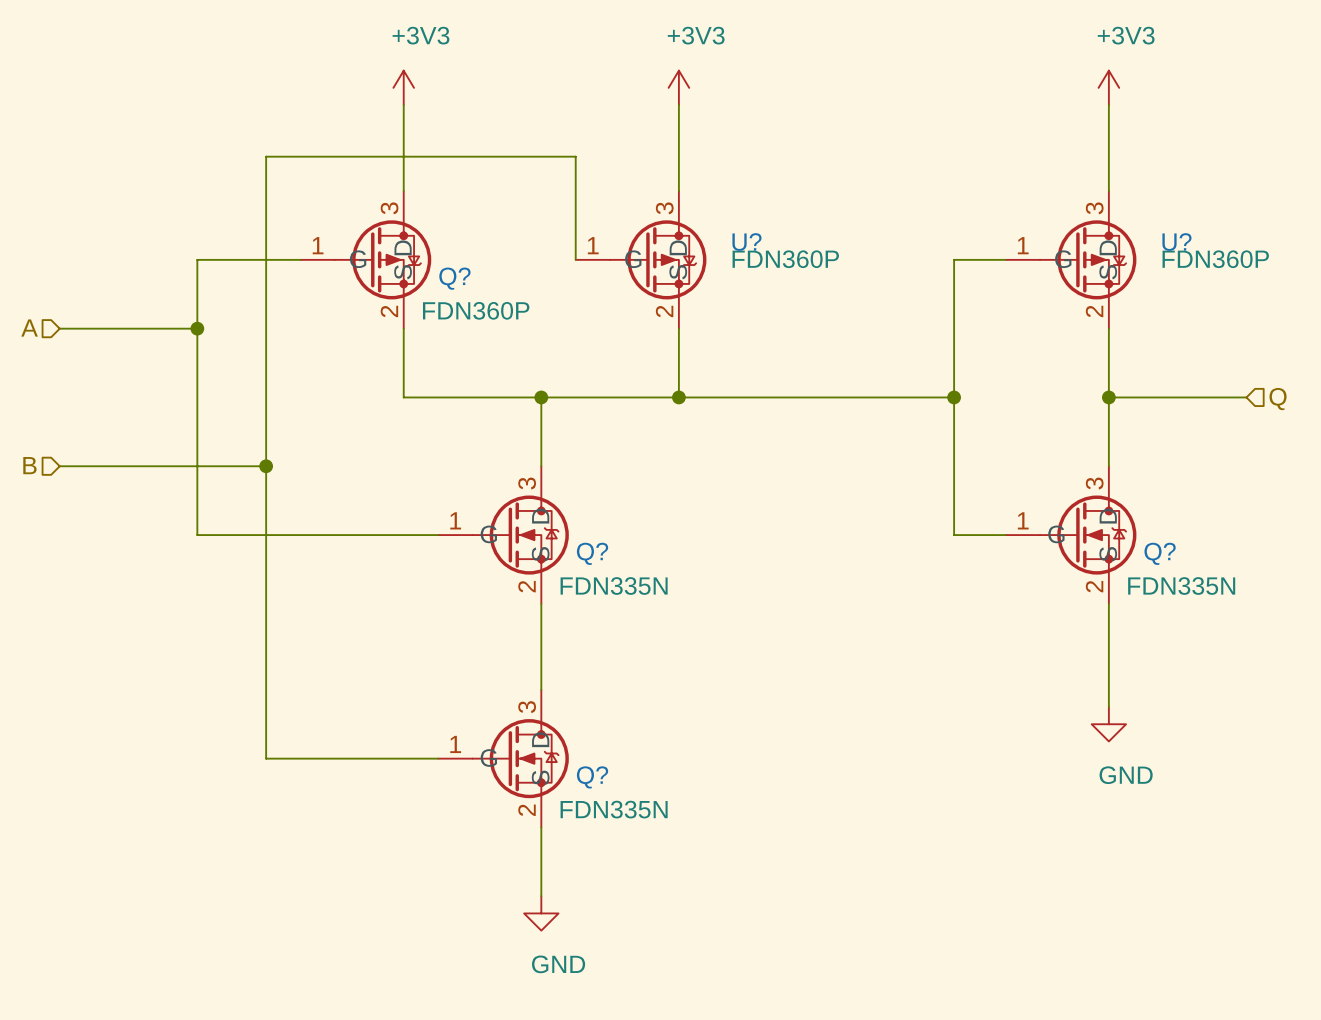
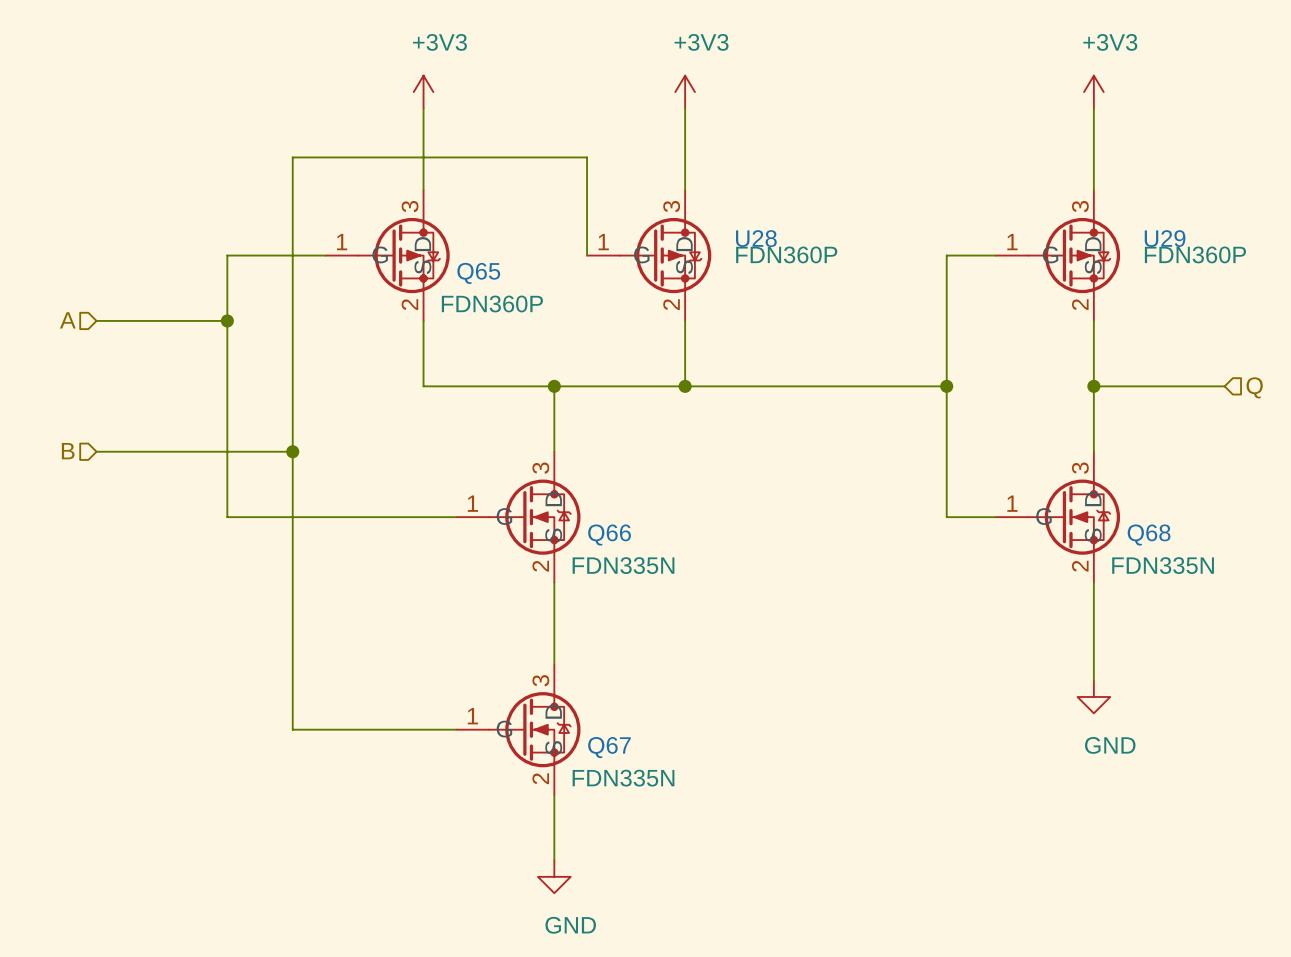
U? name: U? (746, 242) -> U28 (756, 238)
U? name: U? (1176, 242) -> U29 (1165, 238)
Q? name: Q? (454, 278) -> Q65 (478, 273)
Q? name: Q? (592, 553) -> Q66 (609, 535)
Q? name: Q? (1160, 553) -> Q68 (1149, 535)
Q? name: Q? (592, 777) -> Q67 (609, 747)

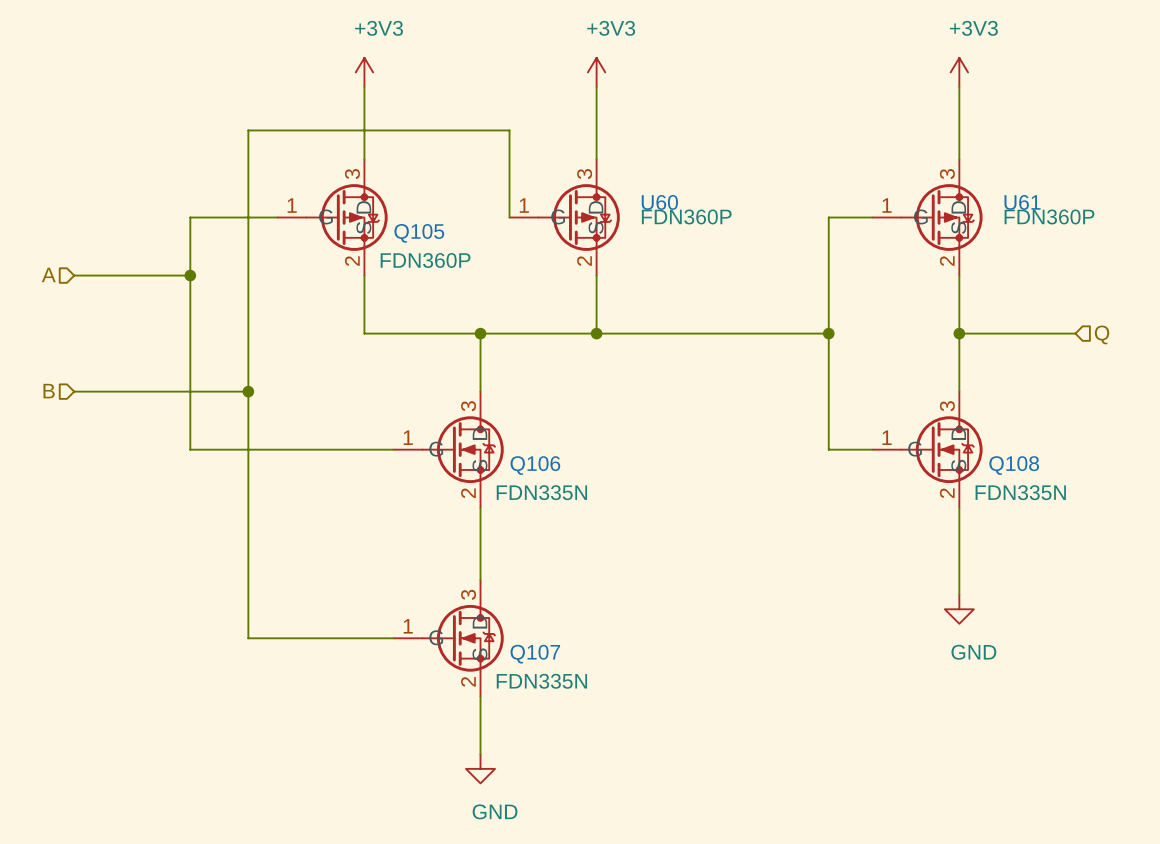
U28 name: U28 (756, 238) -> U60 (659, 202)
U29 name: U29 (1165, 238) -> U61 (1022, 202)
Q65 name: Q65 (478, 273) -> Q105 (419, 233)
Q66 name: Q66 (609, 535) -> Q106 (535, 465)
Q68 name: Q68 (1149, 535) -> Q108 (1014, 465)
Q67 name: Q67 (609, 747) -> Q107 (535, 654)

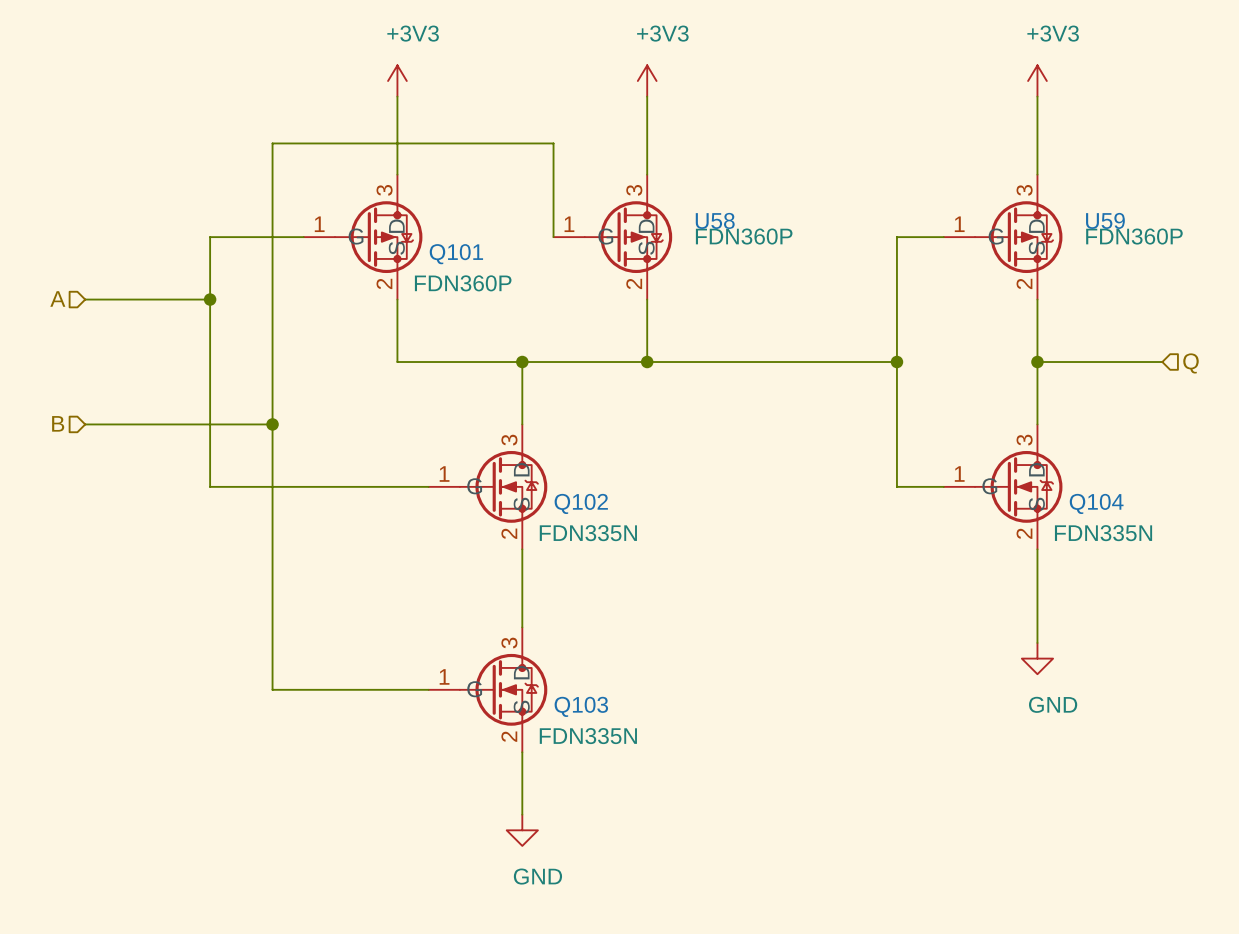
U60 name: U60 (659, 202) -> U58 (715, 220)
U61 name: U61 (1022, 202) -> U59 (1105, 220)
Q105 name: Q105 (419, 233) -> Q101 (456, 254)
Q106 name: Q106 (535, 465) -> Q102 (581, 503)
Q108 name: Q108 (1014, 465) -> Q104 (1096, 503)
Q107 name: Q107 (535, 654) -> Q103 (581, 706)

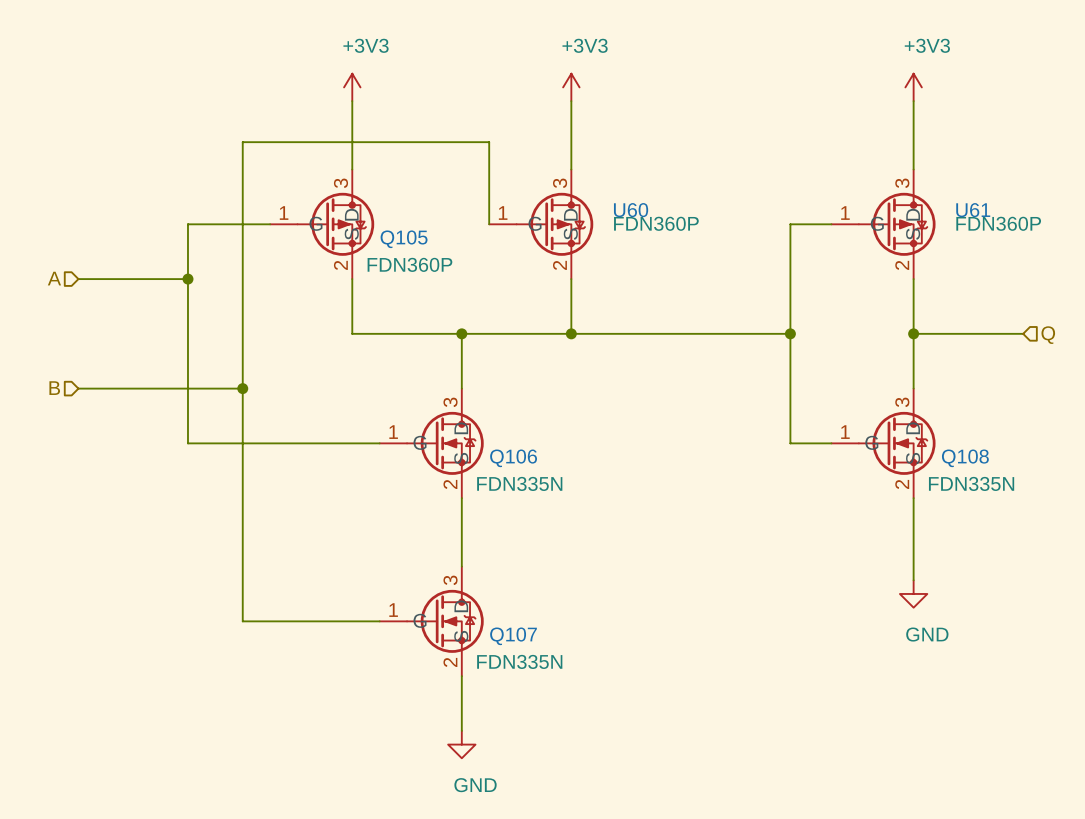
U58 name: U58 (715, 220) -> U60 (631, 210)
U59 name: U59 (1105, 220) -> U61 (973, 210)
Q101 name: Q101 (456, 254) -> Q105 (404, 239)
Q102 name: Q102 (581, 503) -> Q106 (513, 458)
Q104 name: Q104 (1096, 503) -> Q108 (965, 458)
Q103 name: Q103 (581, 706) -> Q107 (513, 636)

